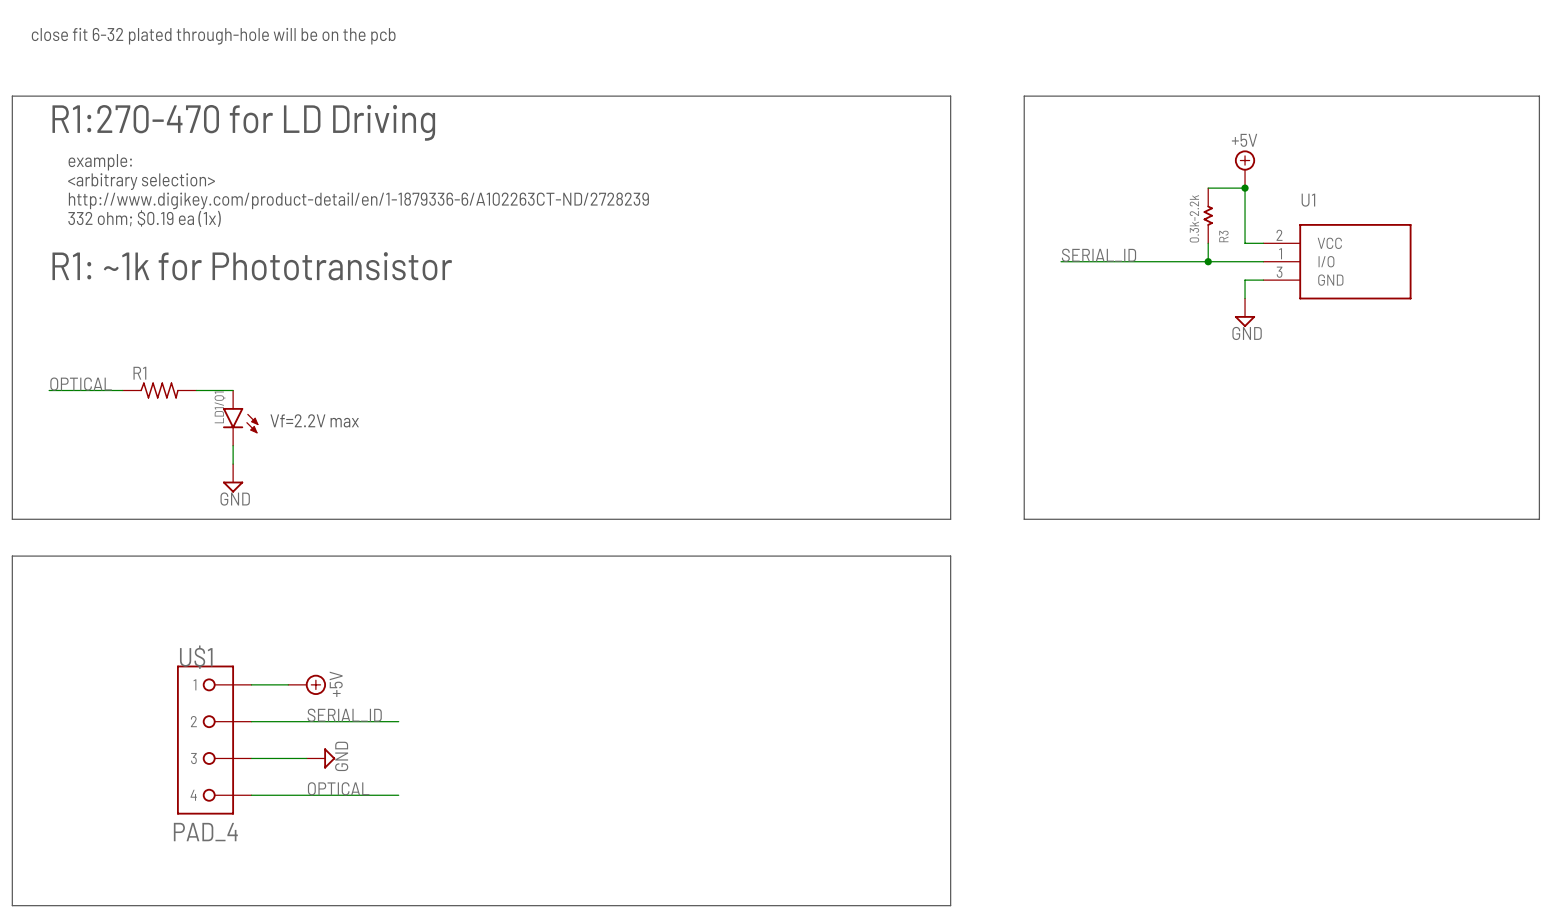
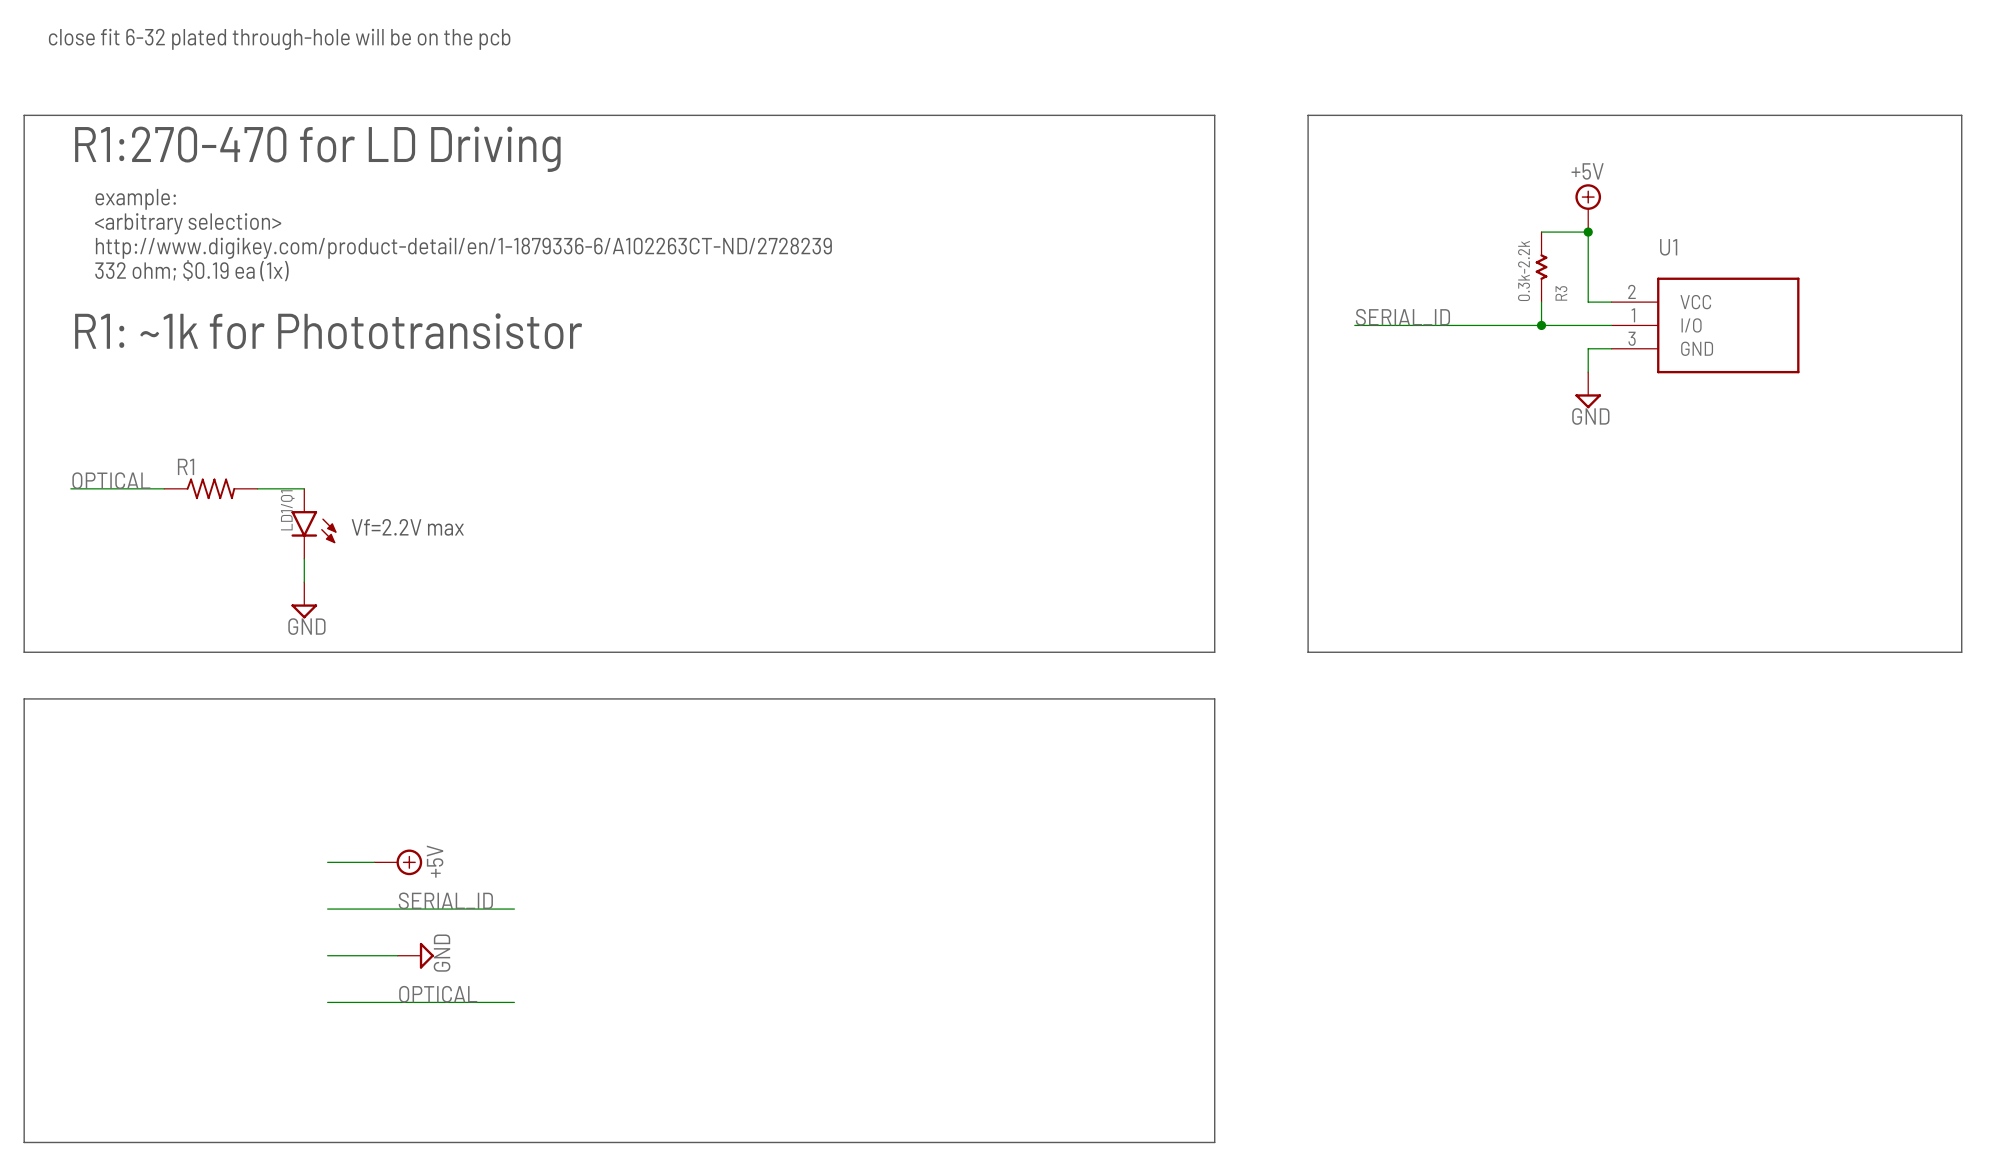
U$1: PAD_4 (214, 740) -> none

